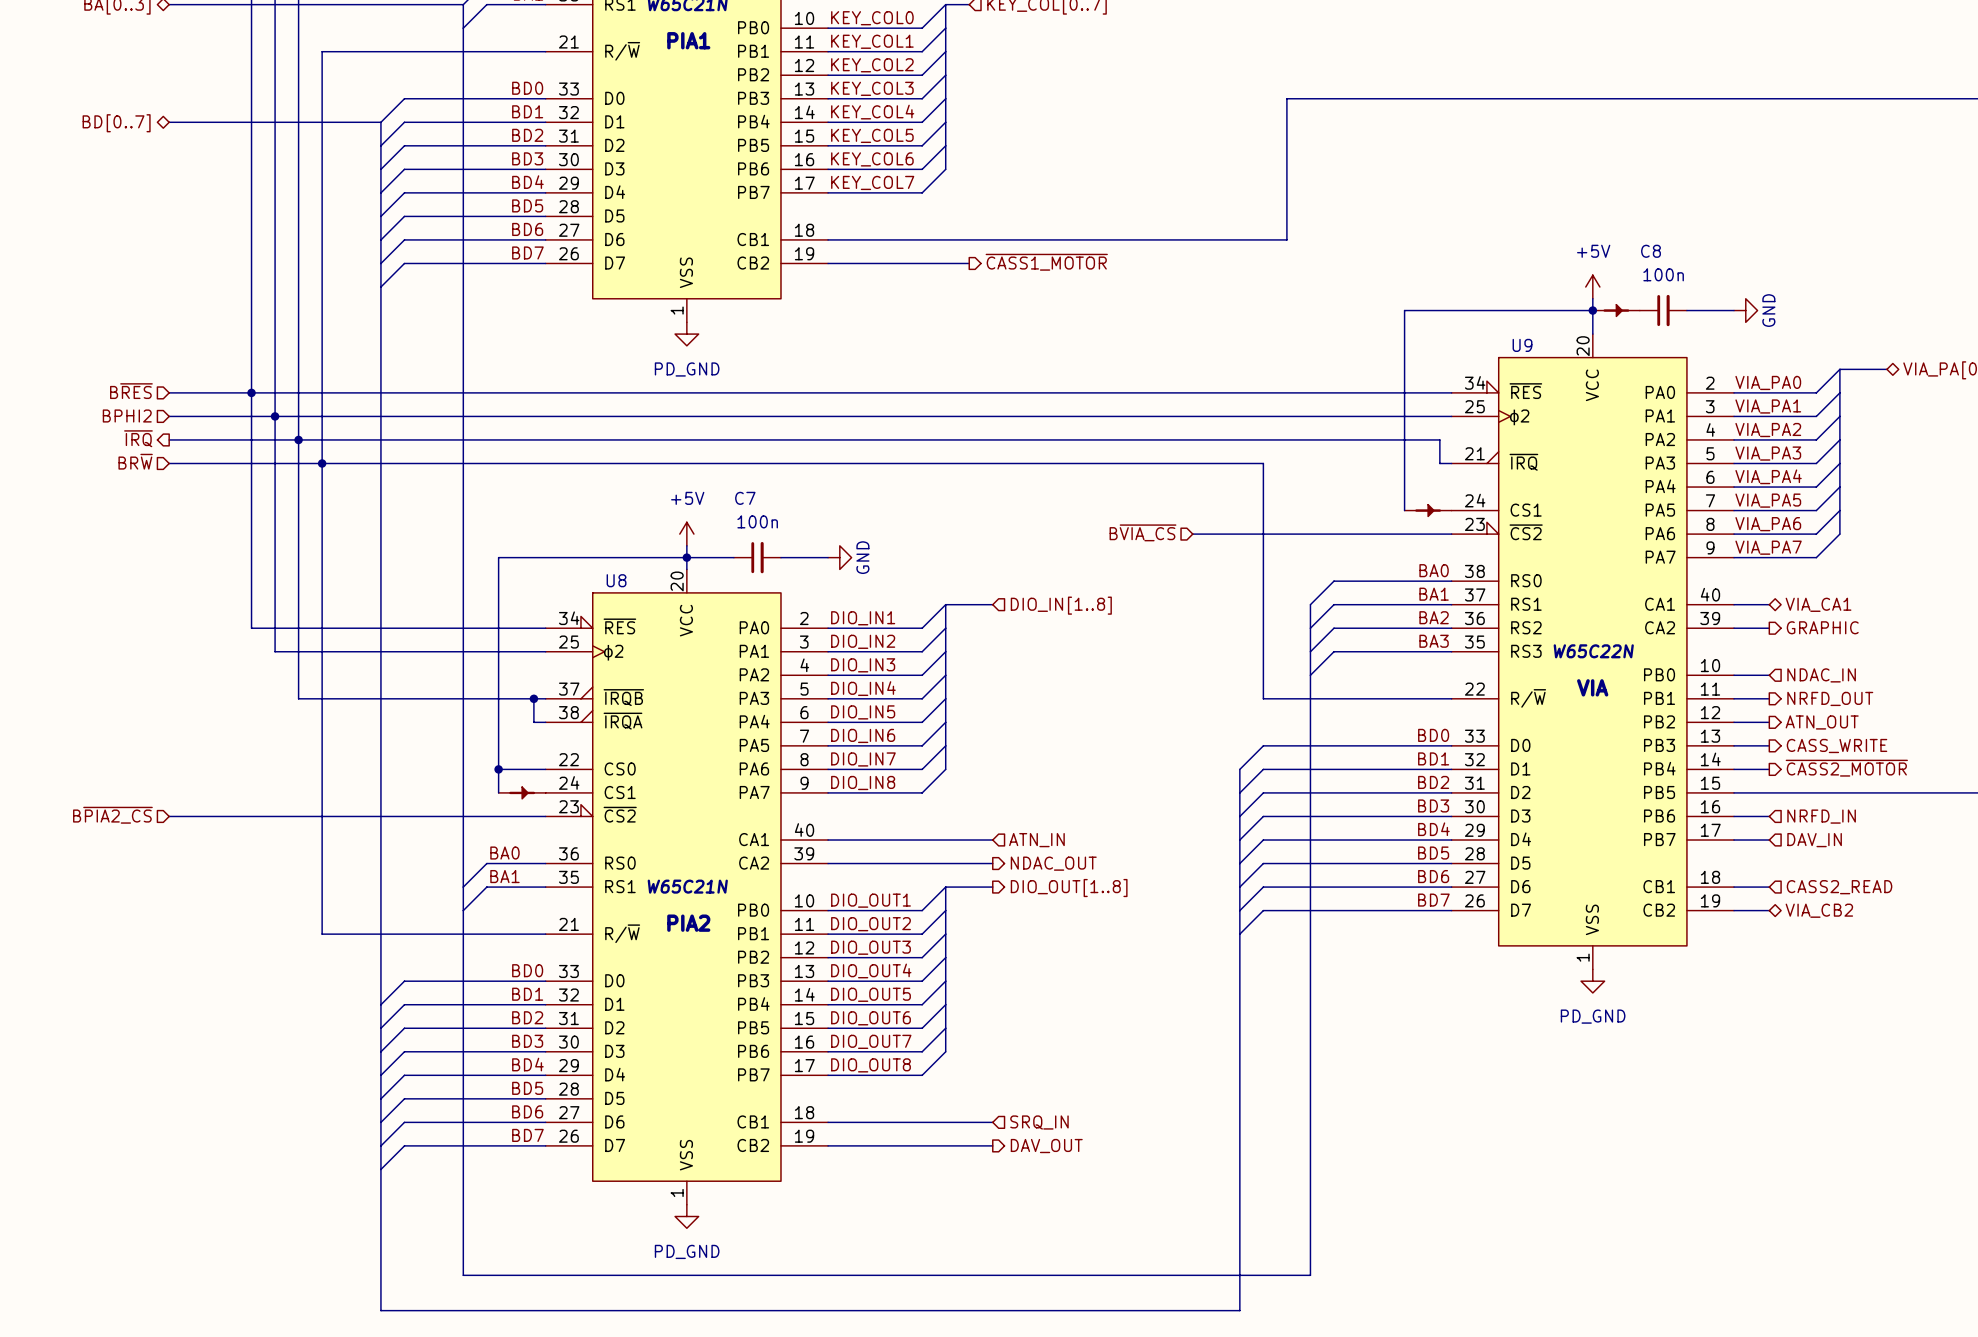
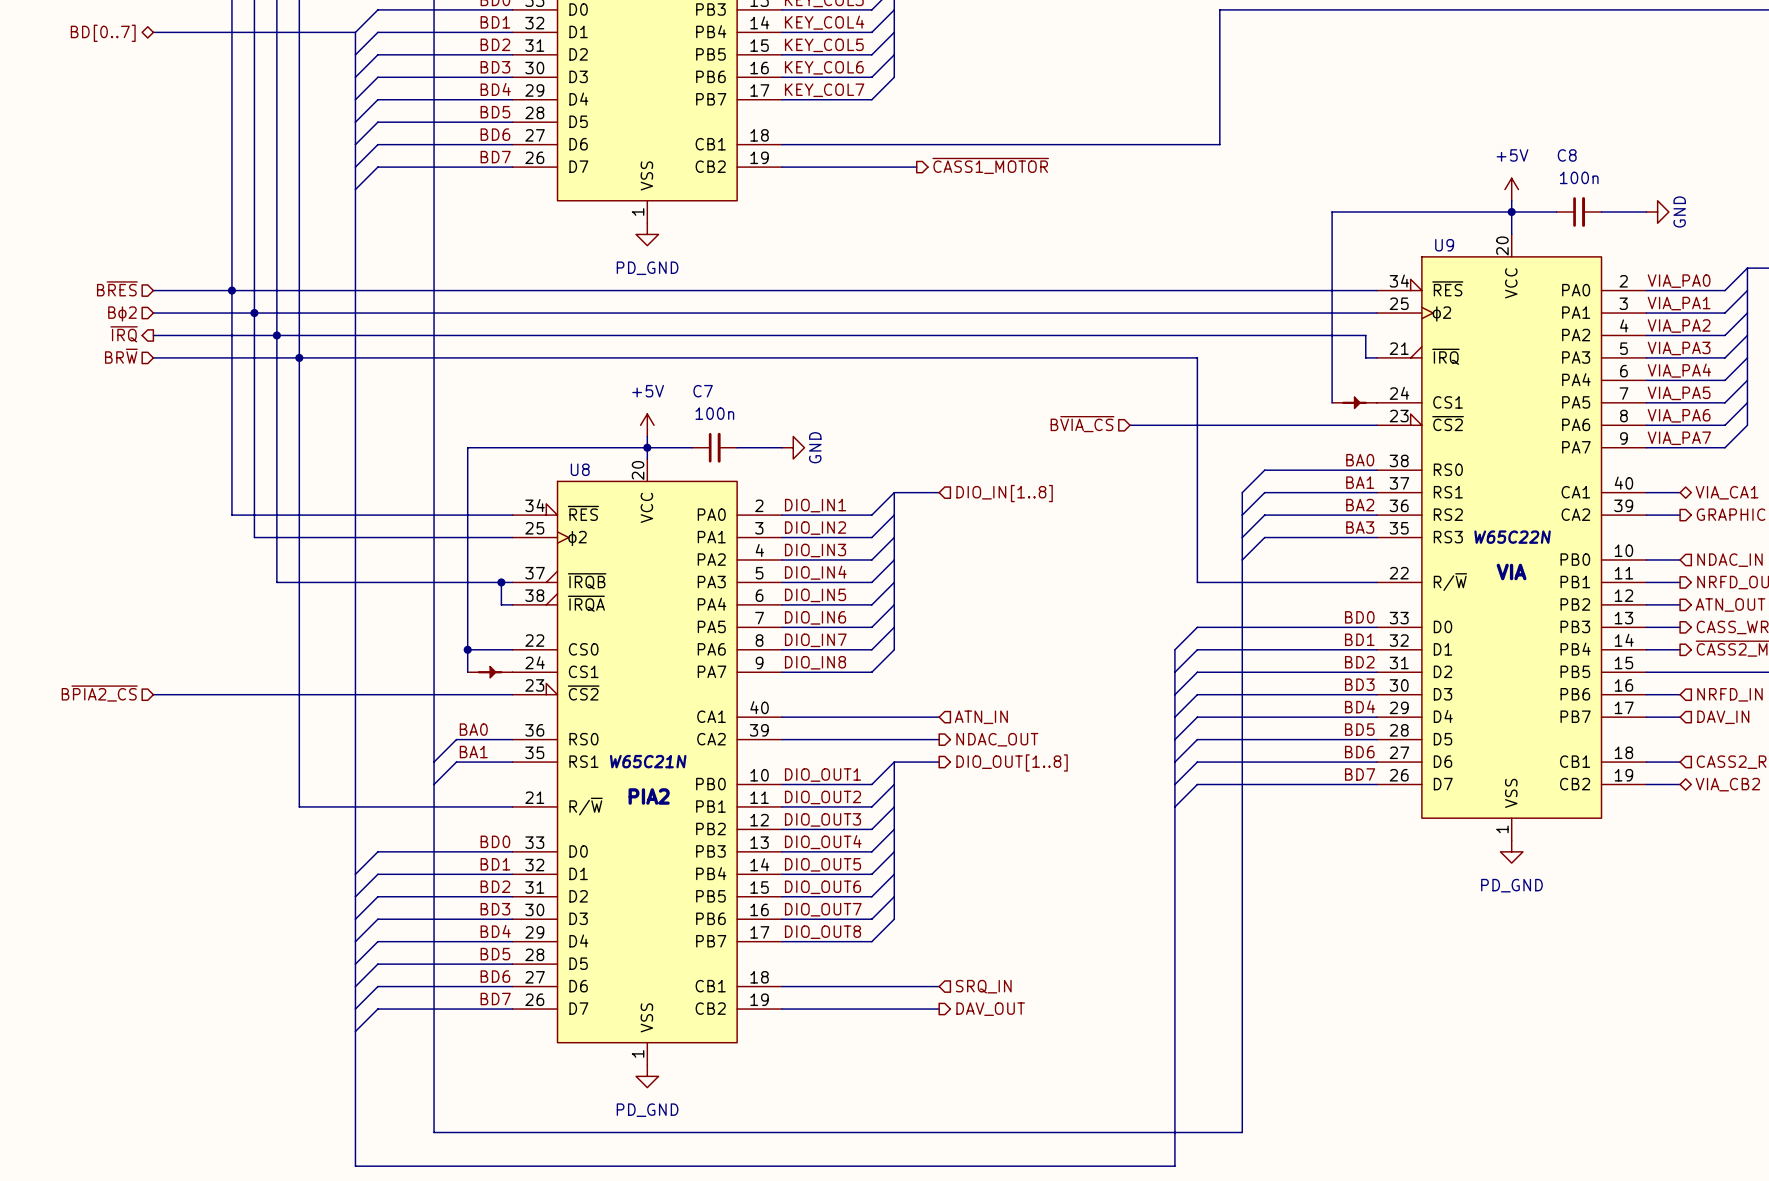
part: (1616, 310) -> none
hierarchical label: BPHI2 (127, 415) -> Bϕ2 (122, 313)

